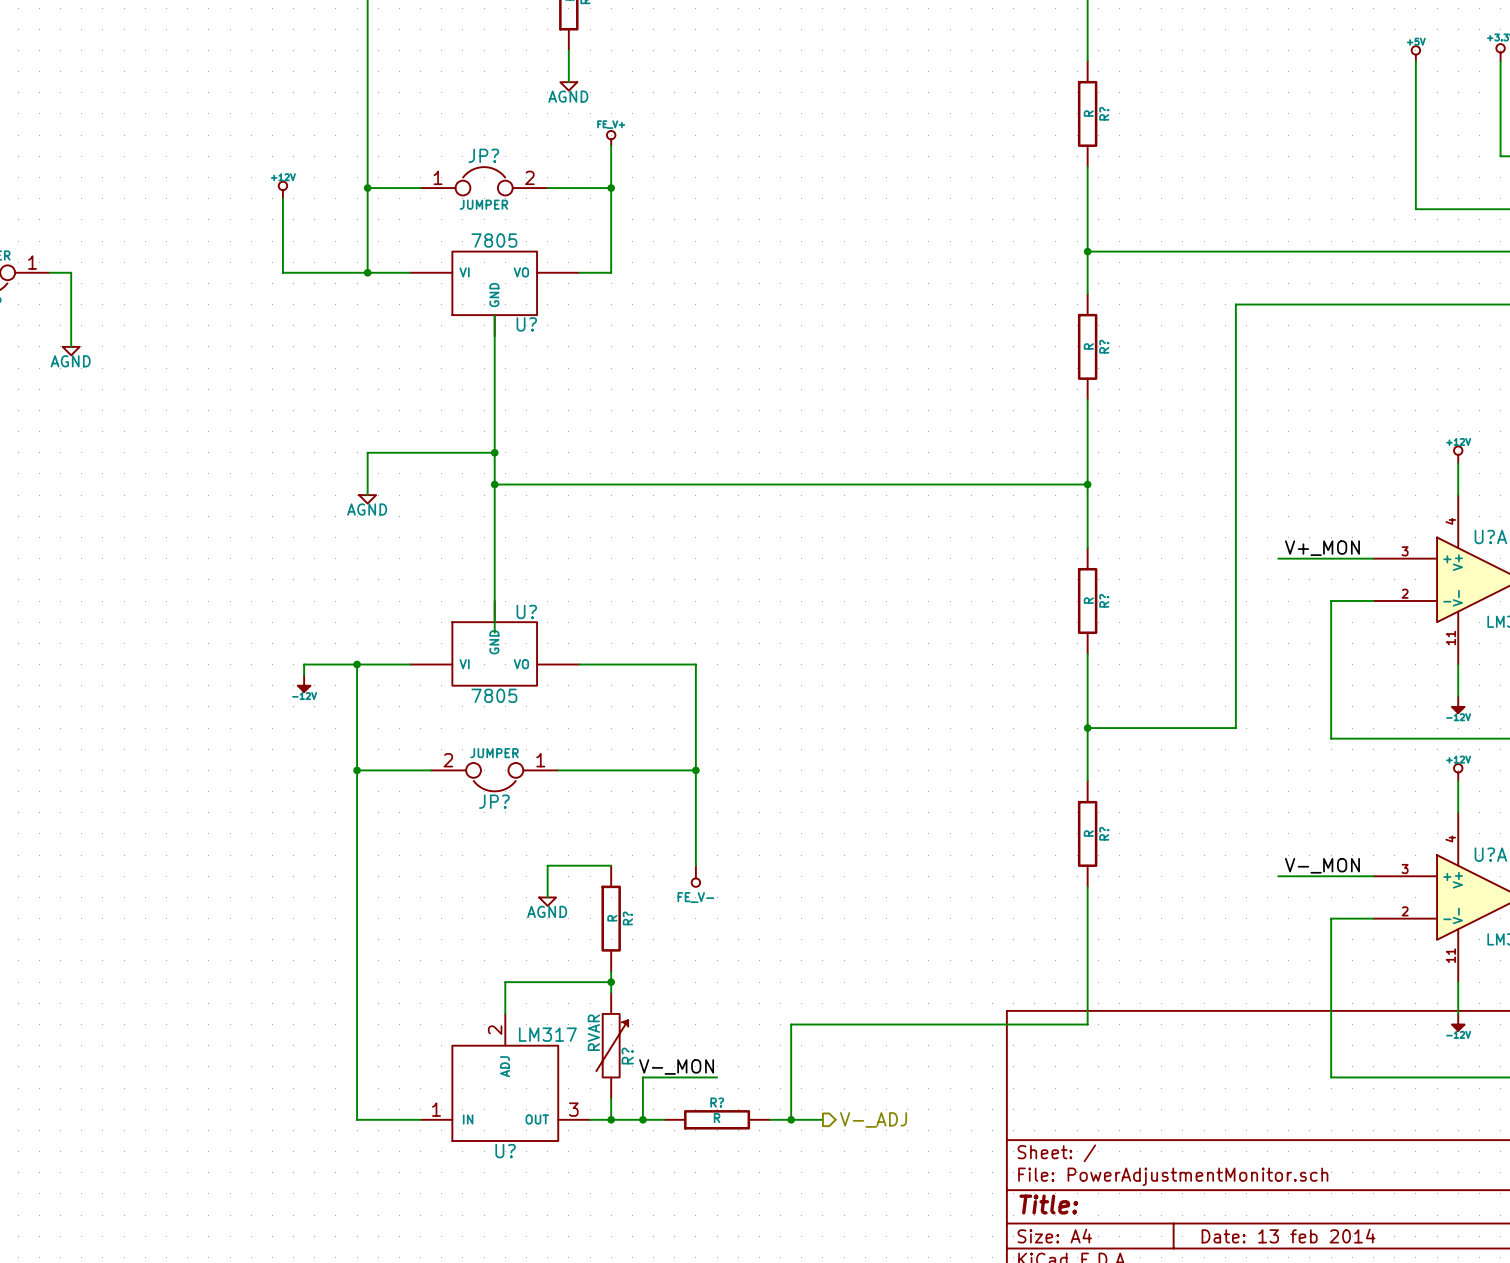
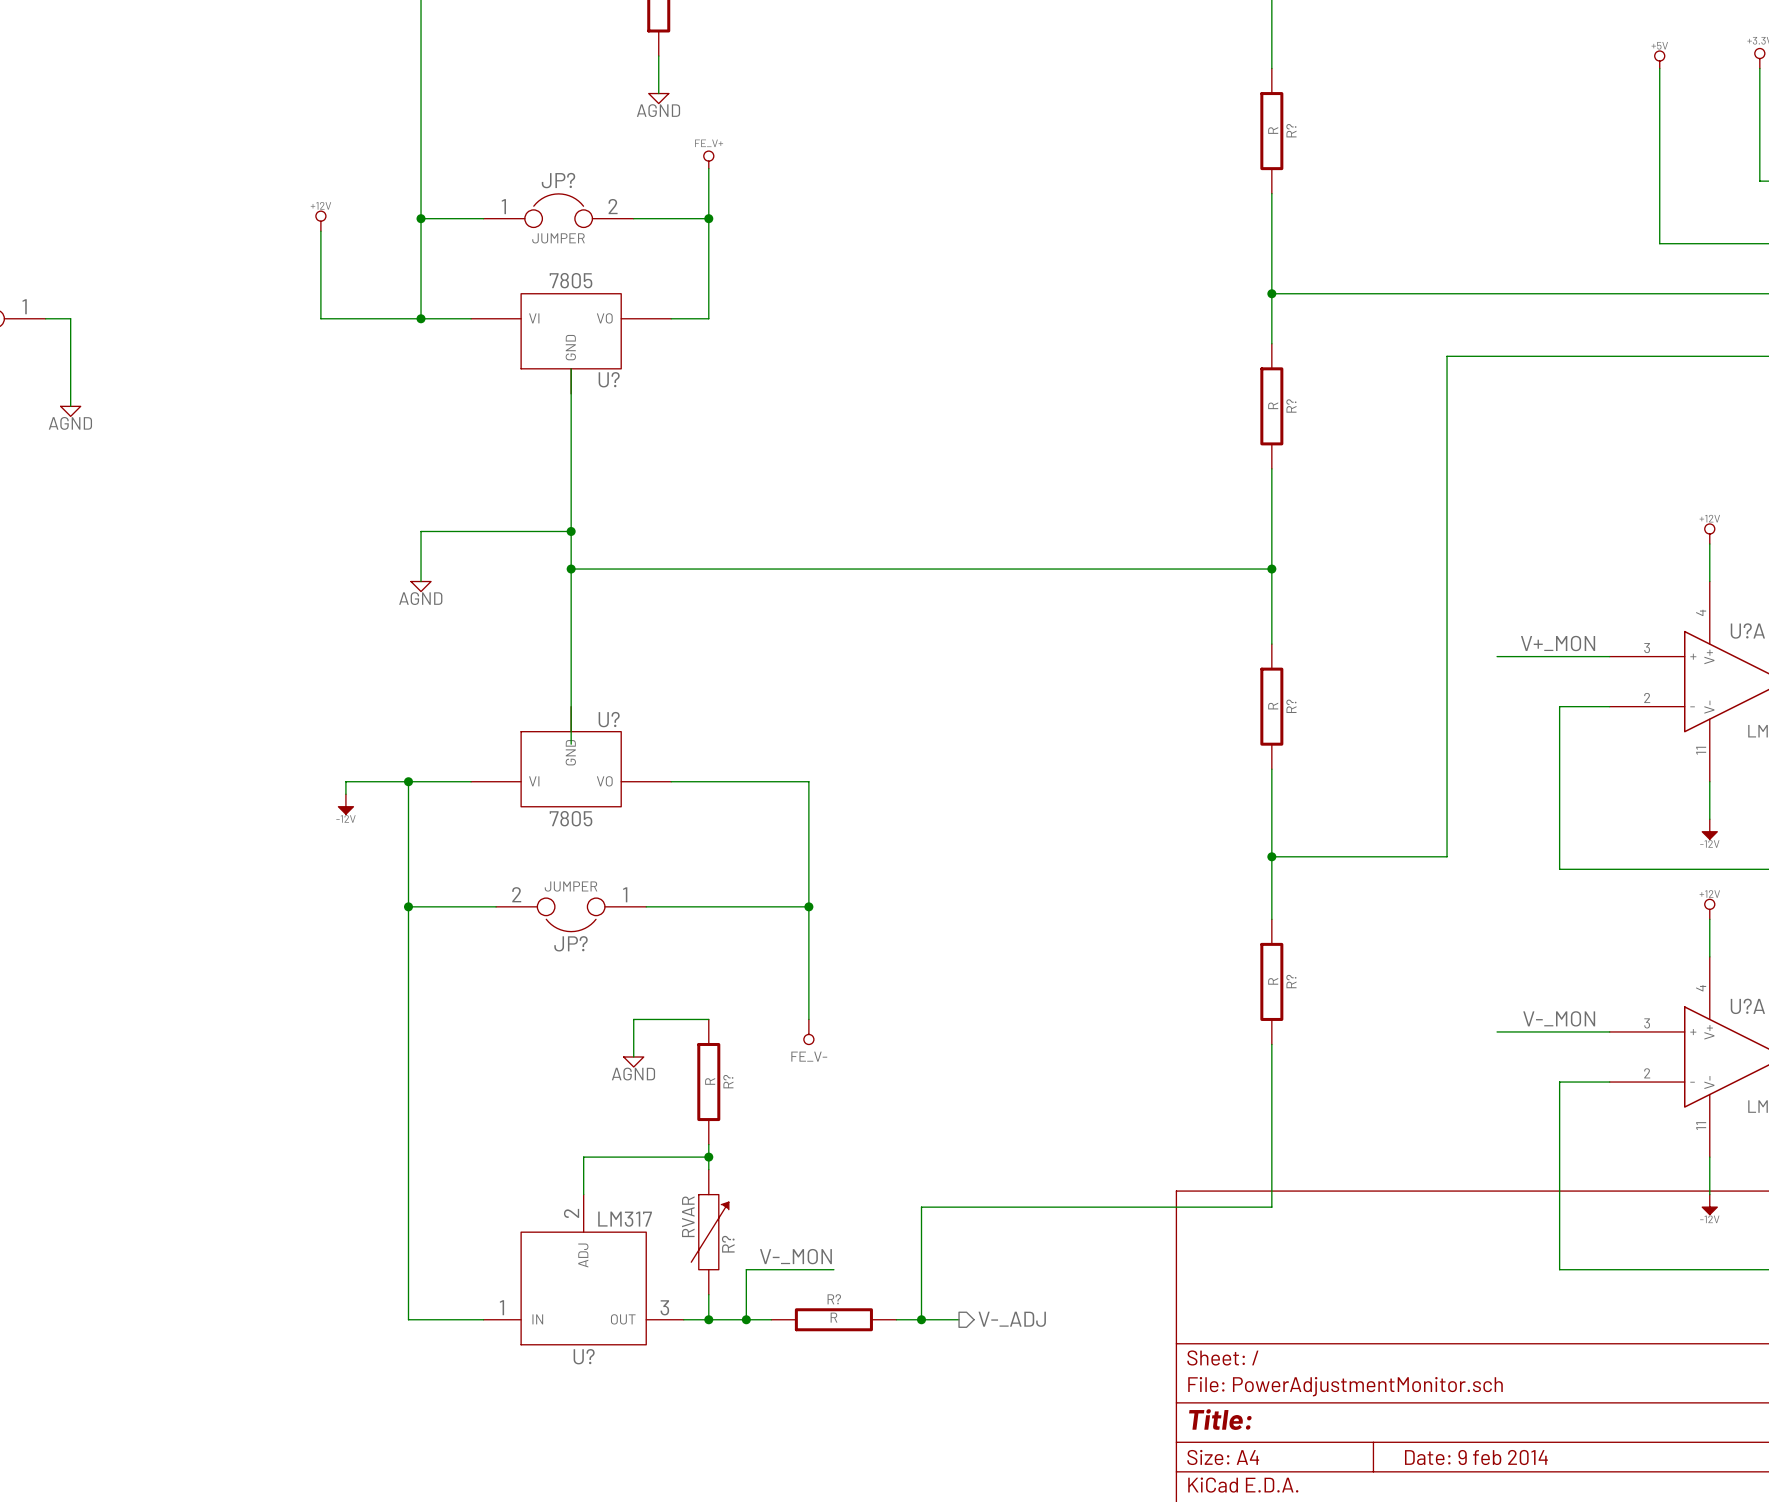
title block: Date: 13 feb 2014 (1288, 1236) -> Date: 9 feb 2014 (1476, 1457)

